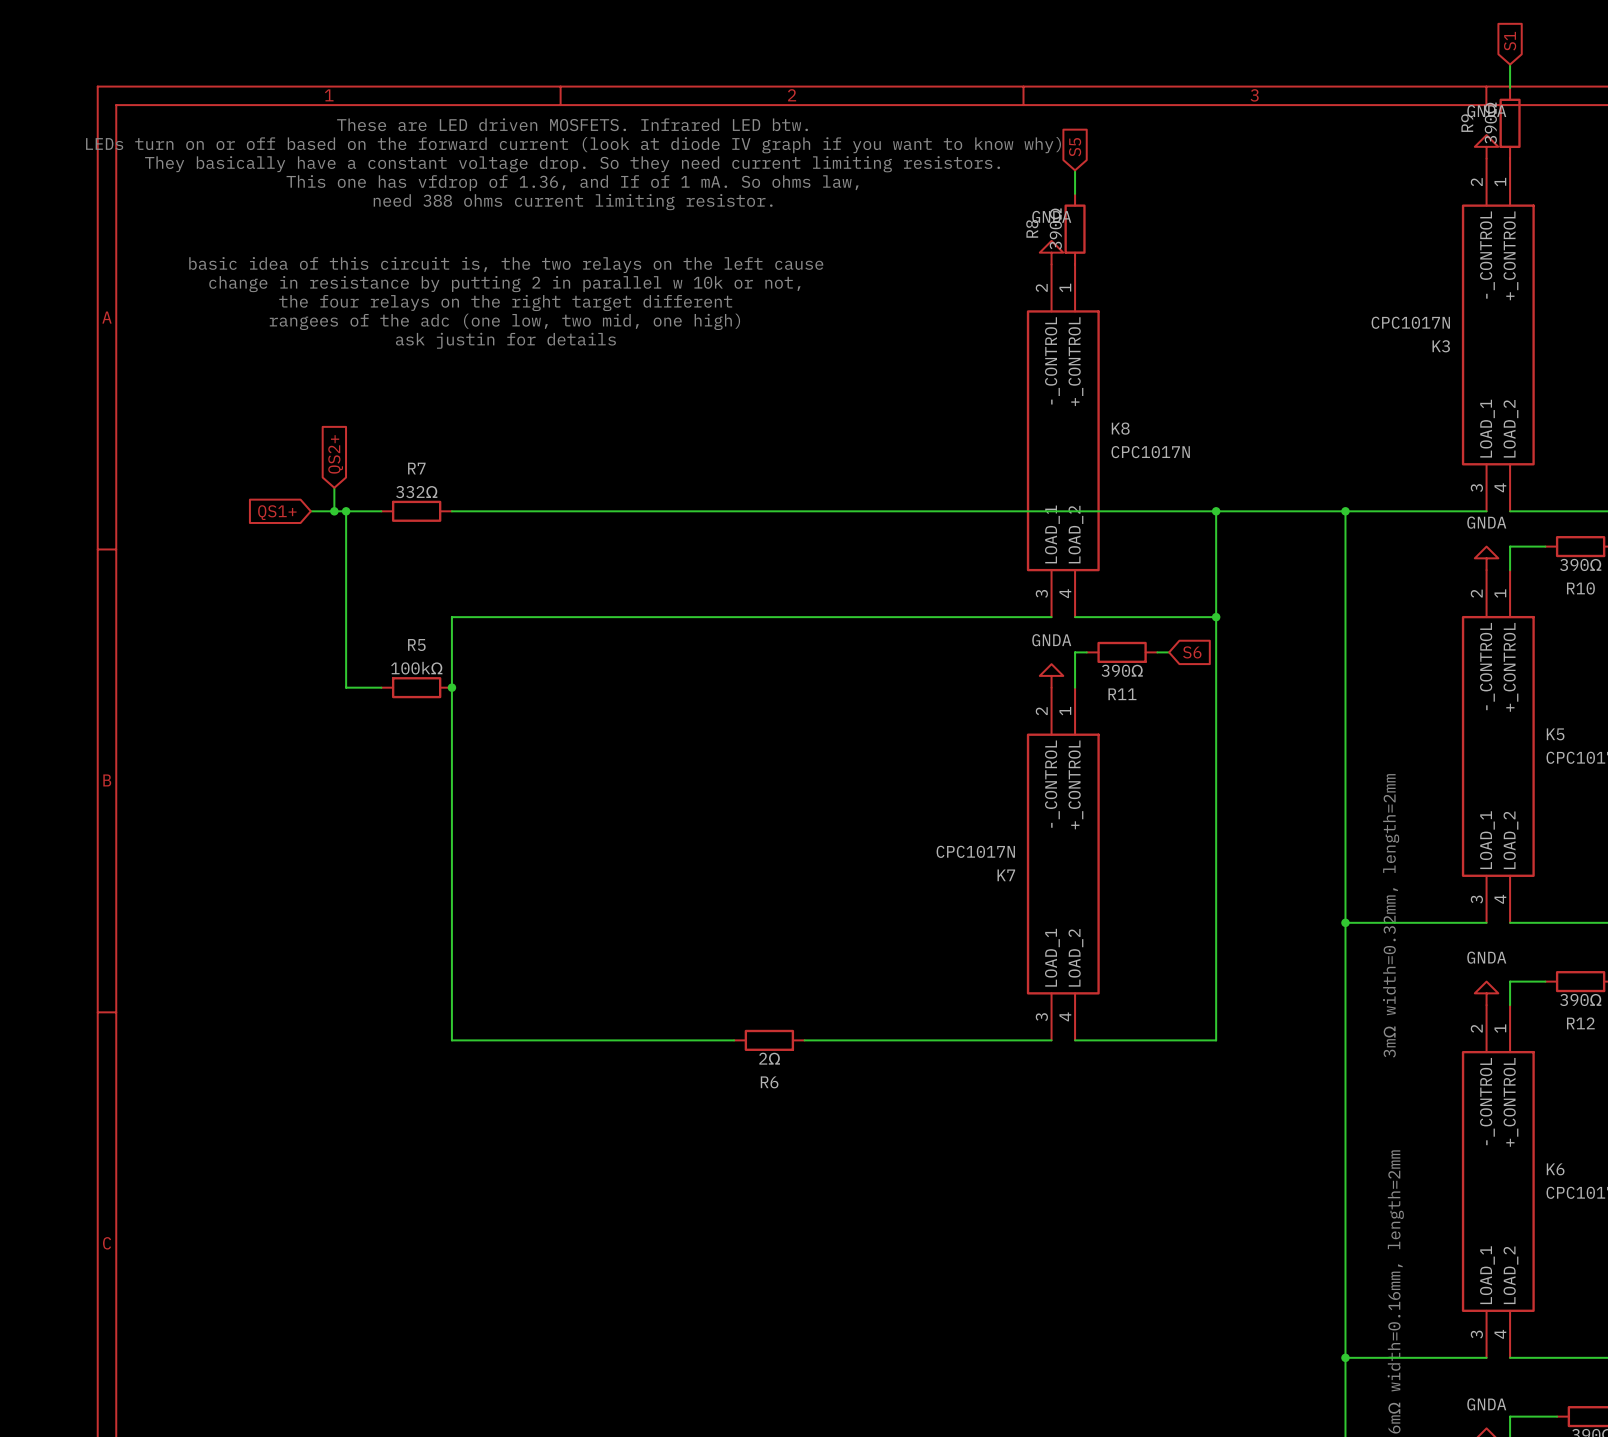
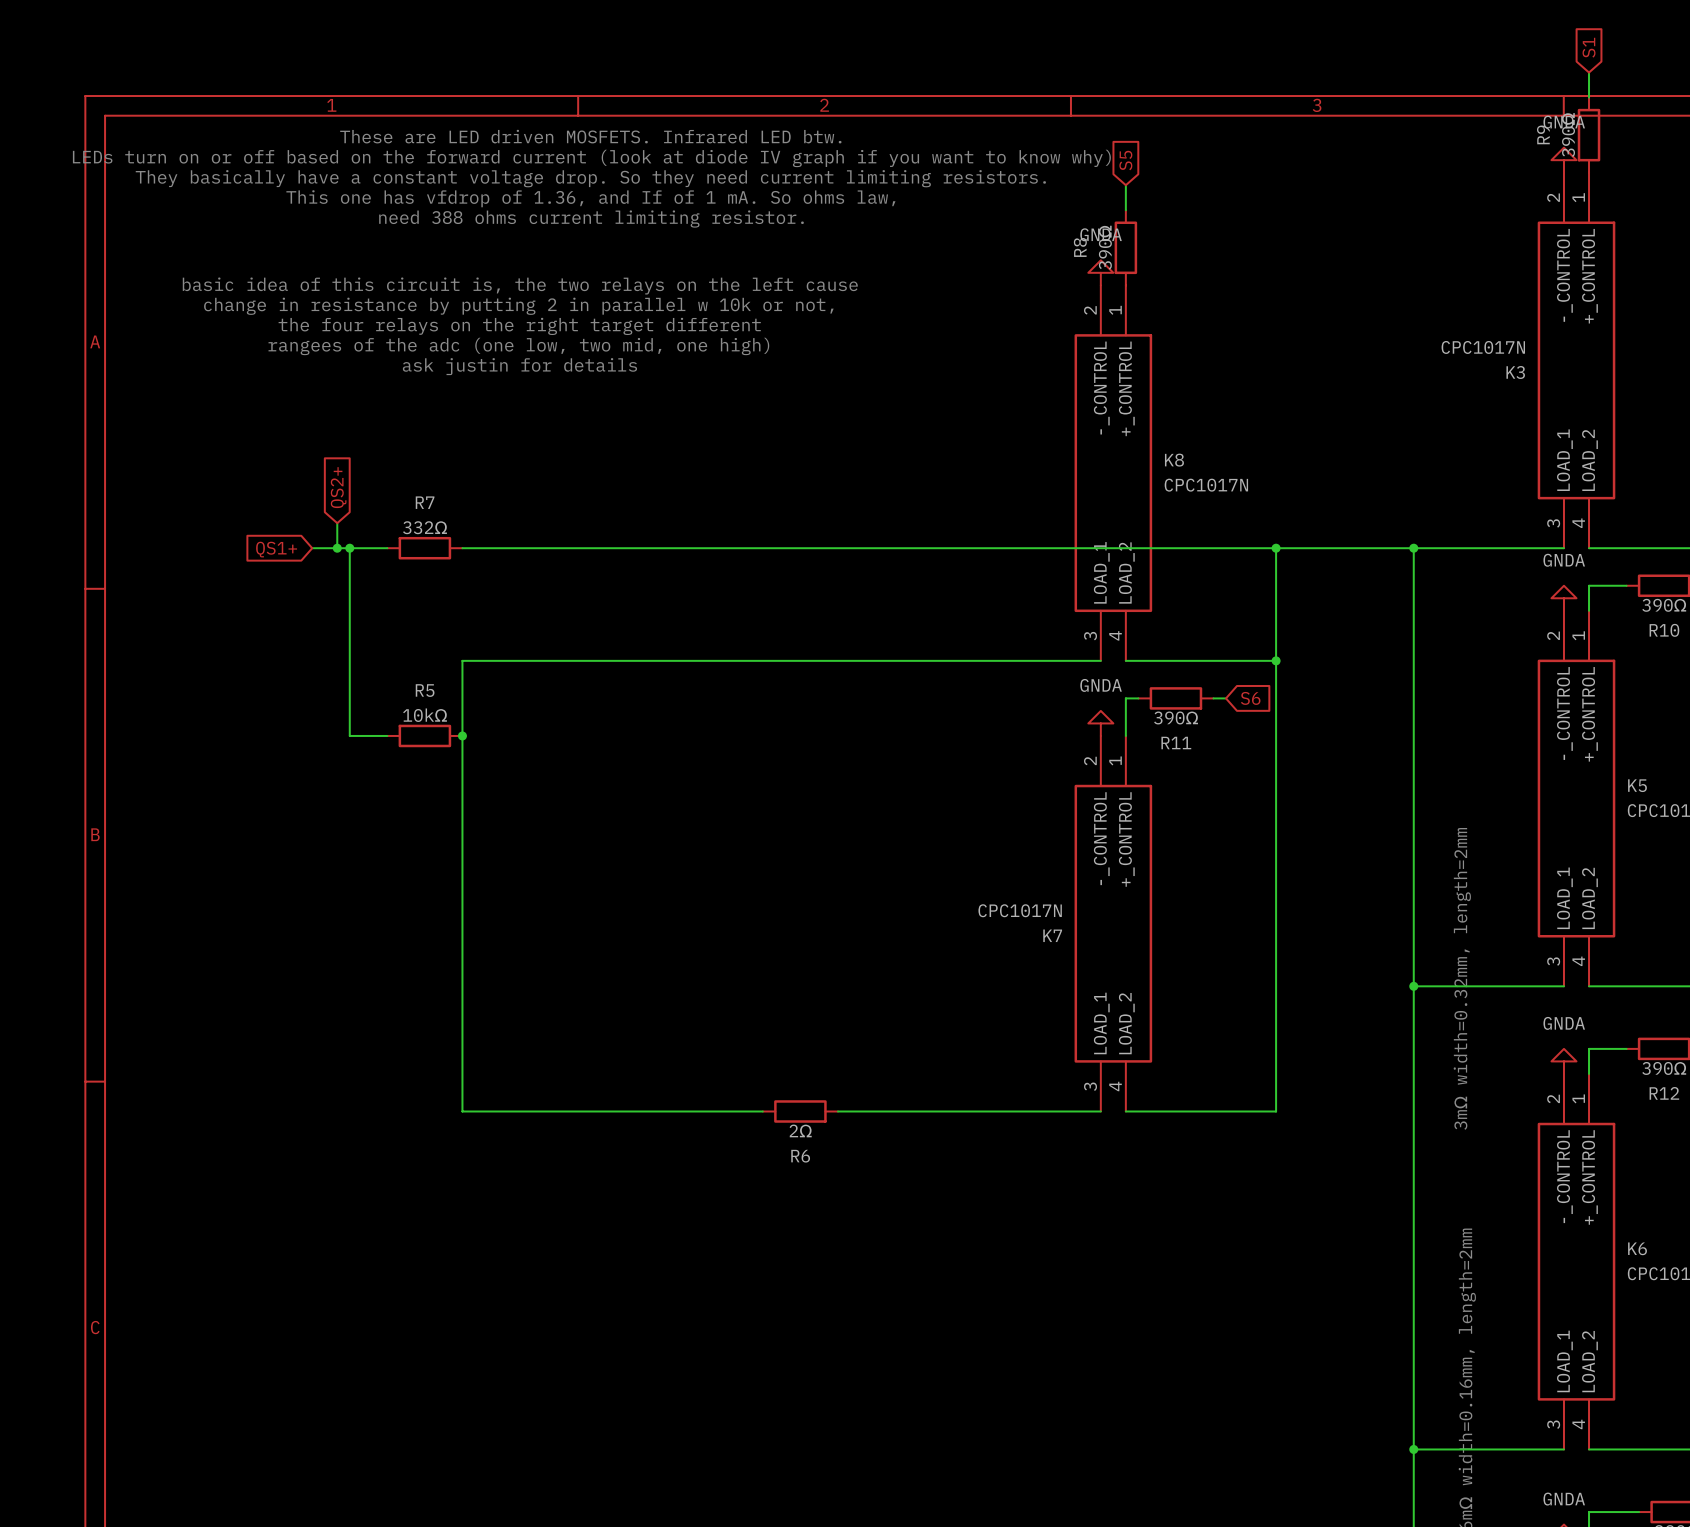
R5 value: 100kΩ (416, 668) -> 10kΩ (425, 715)

